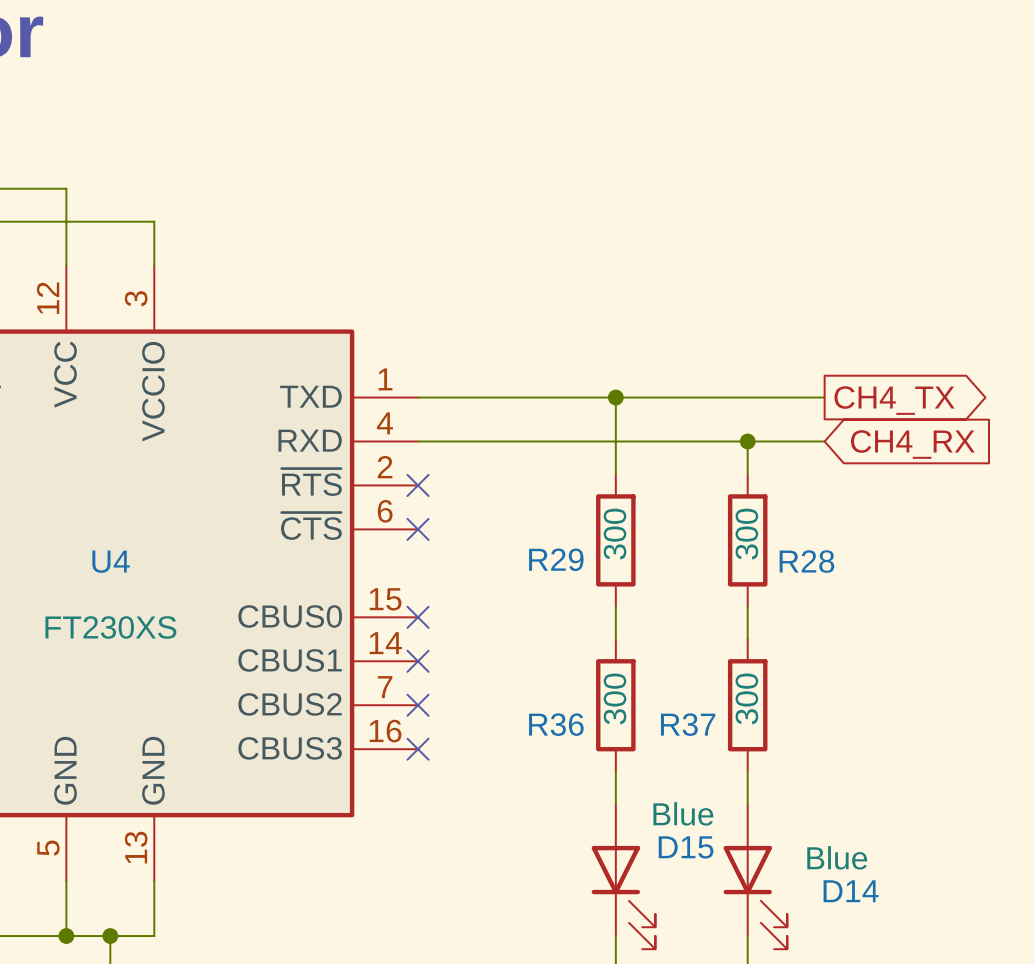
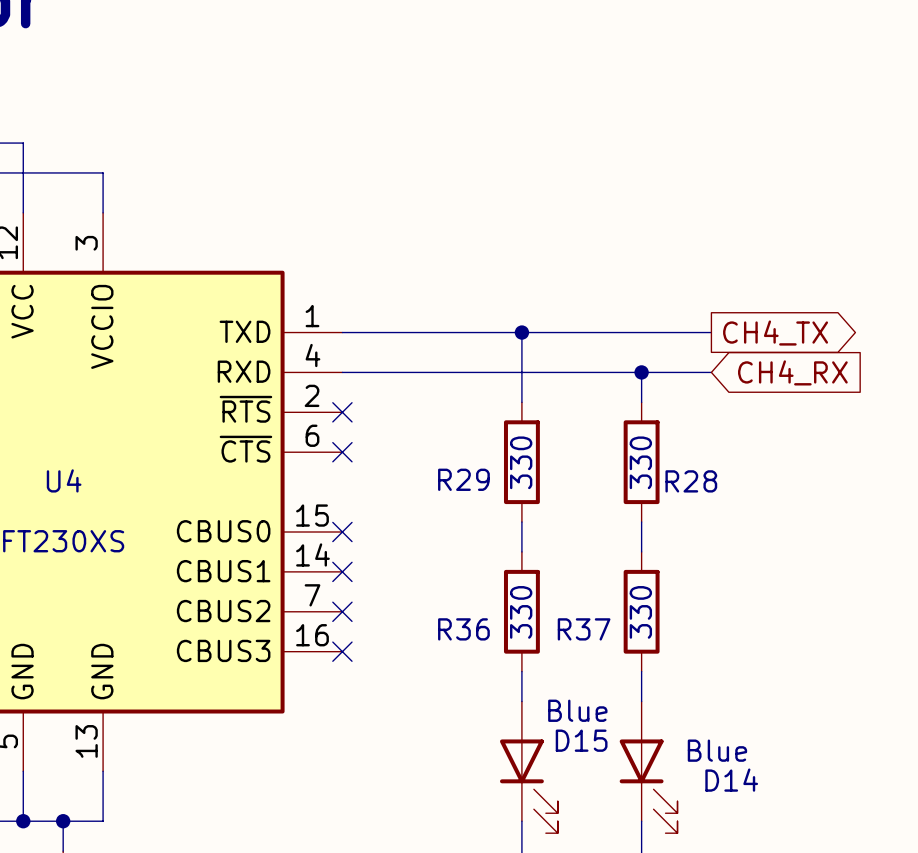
R29 value: 300 (615, 534) -> 330 (521, 462)
R28 value: 300 (746, 534) -> 330 (640, 462)
R36 value: 300 (615, 698) -> 330 (521, 612)
R37 value: 300 (746, 698) -> 330 (640, 612)

